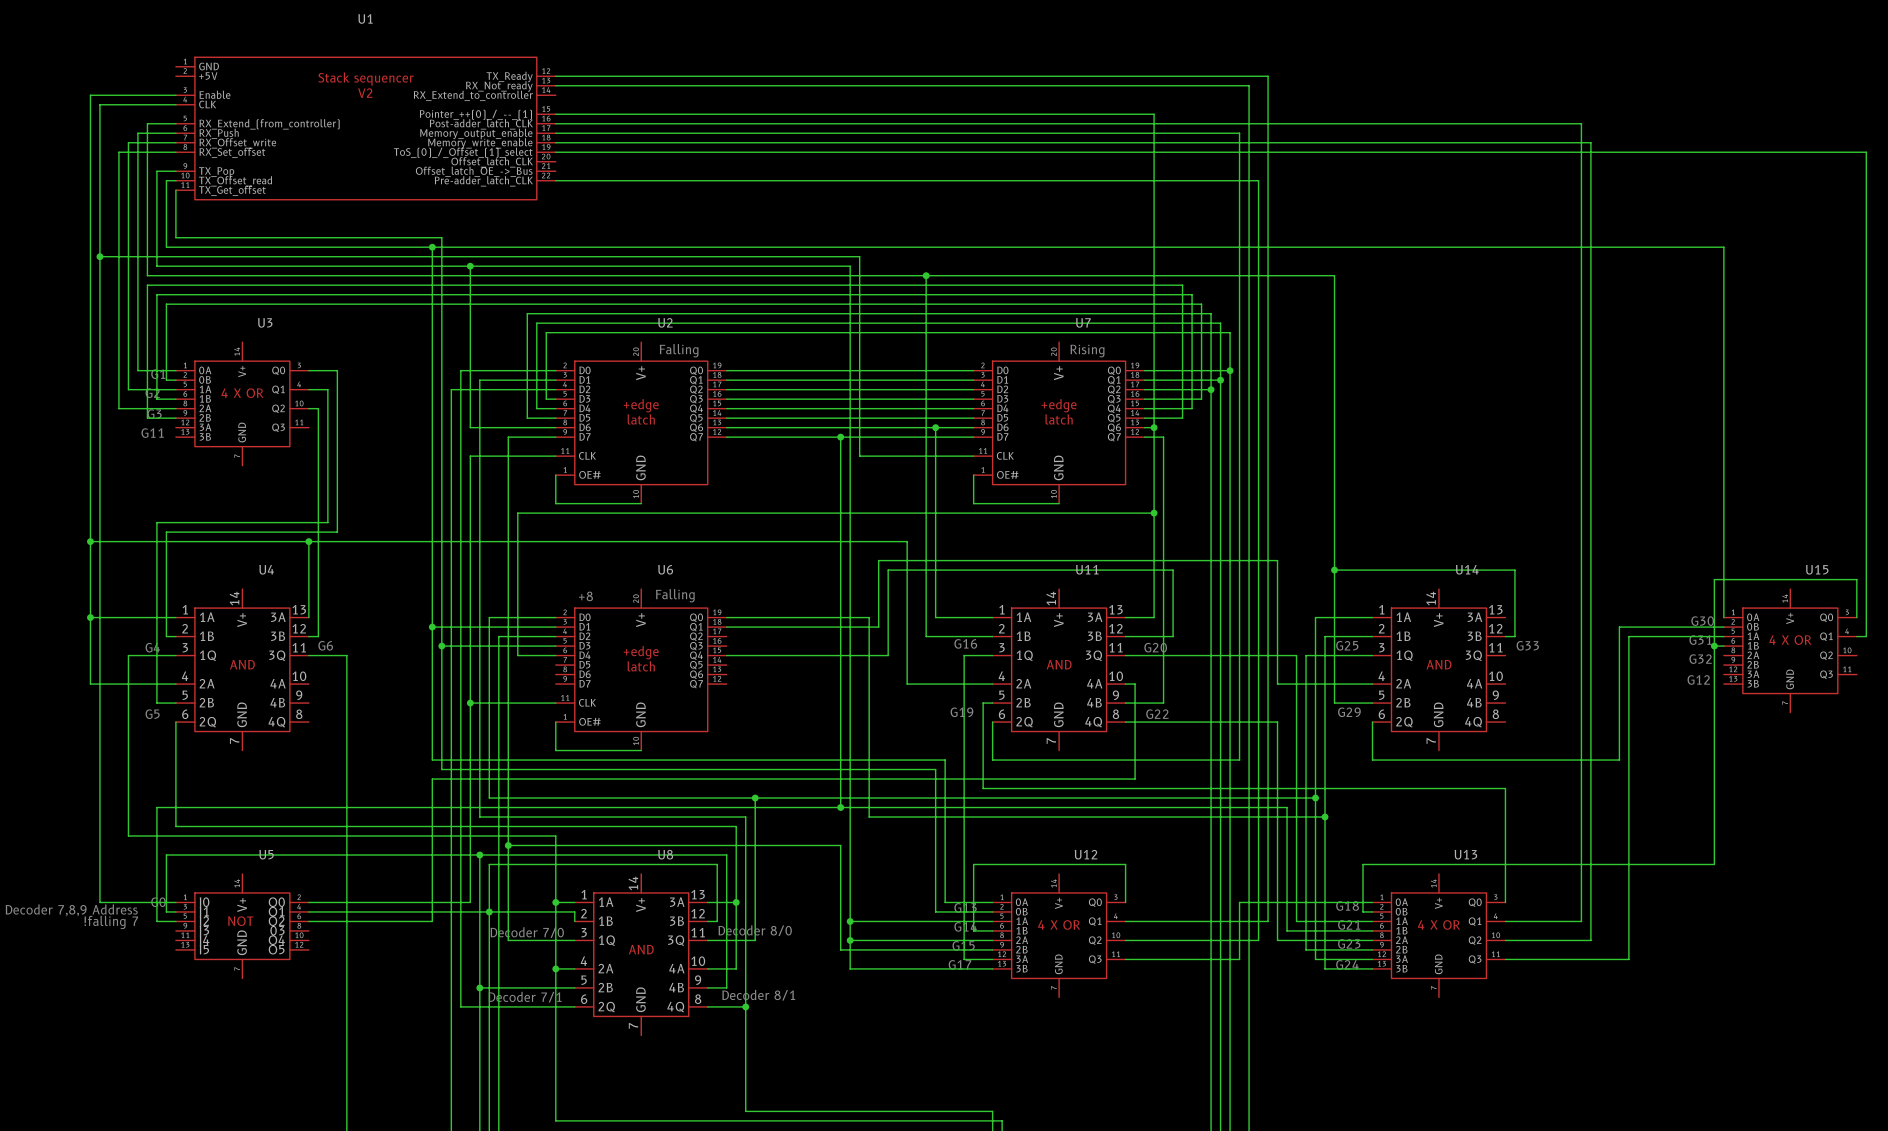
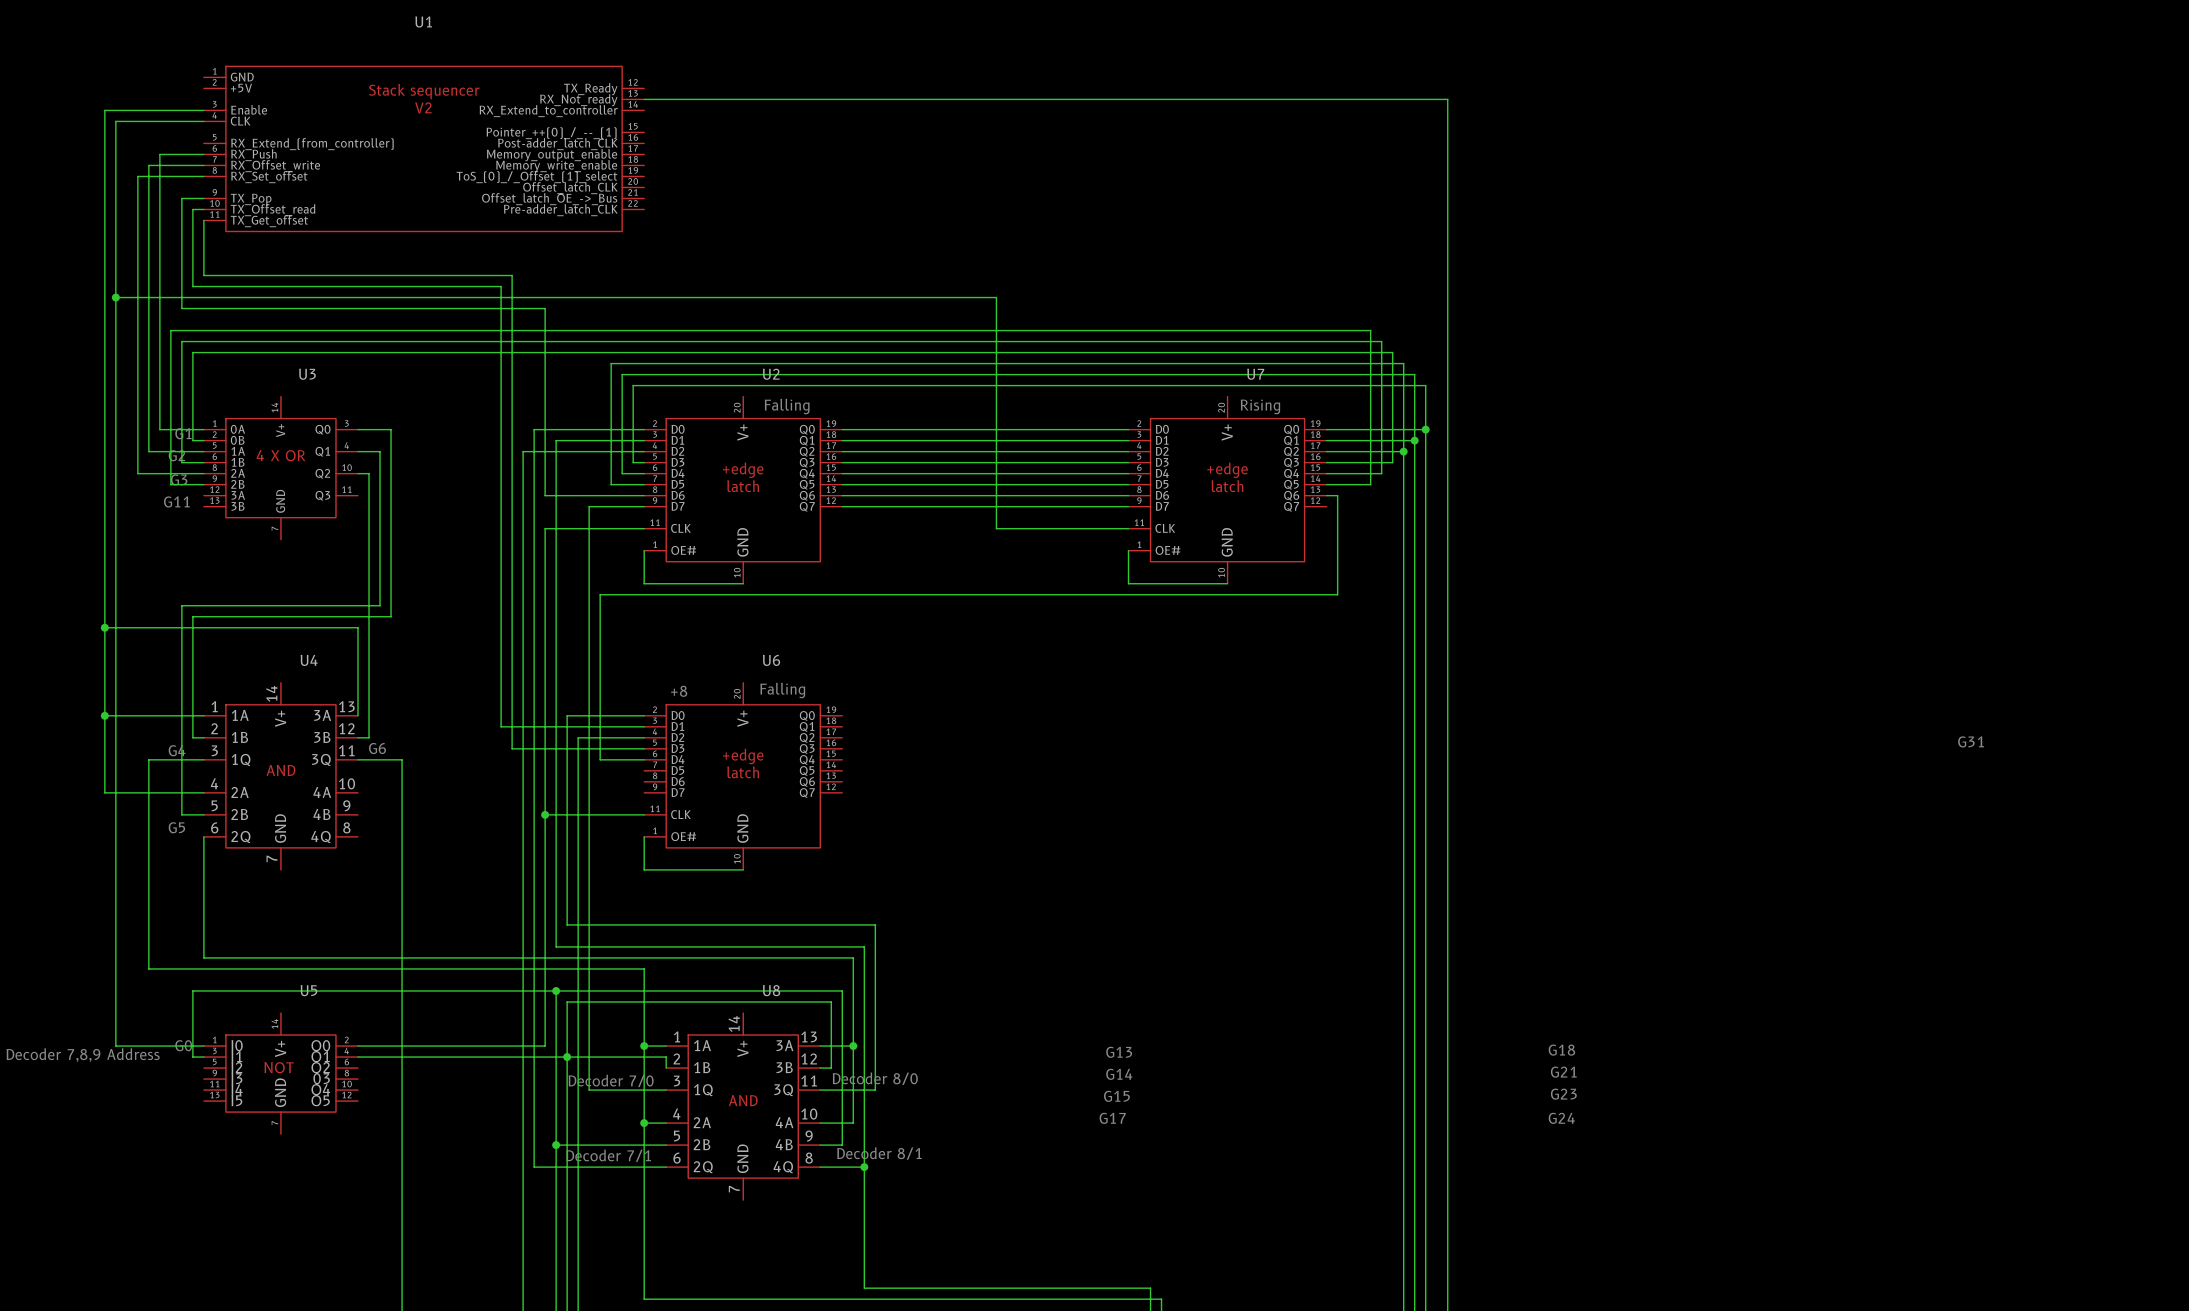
wire: (555, 76) (1268, 76) (1268, 921) (1125, 921) -> none
wire: (555, 114) (1154, 114) (1154, 427) -> none
wire: (175, 123) (147, 123) (147, 275) (1334, 275) (1334, 703) (1372, 703) -> none
wire: (555, 123) (1581, 123) (1581, 921) (1505, 921) -> none
wire: (555, 133) (1239, 133) (1239, 760) (992, 760) (992, 722) -> none
wire: (555, 142) (1590, 142) (1590, 940) (1505, 940) -> none
wire: (555, 152) (1866, 152) (1866, 636) (1856, 636) -> none
wire: (555, 180) (1258, 180) (1258, 940) (1125, 940) -> none
wire: (432, 247) (1723, 247) (1723, 617) -> none
junction: (432, 247) -> none
wire: (470, 266) (850, 266) (850, 968) (992, 968) -> none
junction: (470, 266) -> none
wire: (926, 275) (926, 636) (992, 636) -> none
junction: (926, 275) -> none
wire: (935, 427) (935, 617) (992, 617) -> none
junction: (935, 427) -> none
junction: (1154, 427) -> none
wire: (840, 437) (840, 807) -> none
junction: (840, 437) -> none
wire: (1144, 437) (1163, 437) (1163, 703) (1125, 703) -> none
wire: (1154, 513) (1154, 617) (1125, 617) -> none
junction: (1154, 513) -> none
wire: (308, 541) (907, 541) (907, 684) (992, 684) -> none
junction: (308, 541) -> none
wire: (1334, 570) (1514, 570) (1514, 636) (1505, 636) -> none
junction: (1334, 570) -> none
wire: (726, 617) (869, 617) (869, 817) (1325, 817) -> none
wire: (1372, 617) (1315, 617) (1315, 959) (1372, 959) -> none
wire: (1856, 617) (1856, 579) (1714, 579) (1714, 864) (1363, 864) (1363, 911) (1372, 911) -> none
text: G30 (1702, 621) -> none
wire: (432, 627) (432, 760) (945, 760) (945, 902) (992, 902) -> none
junction: (432, 627) -> none
wire: (726, 627) (878, 627) (878, 560) (1277, 560) (1277, 684) (1372, 684) -> none
wire: (1723, 627) (1619, 627) (1619, 760) (1372, 760) (1372, 722) -> none
wire: (1125, 636) (1173, 636) (1173, 570) (888, 570) (888, 655) (726, 655) -> none
wire: (1372, 636) (1325, 636) (1325, 968) (1372, 968) -> none
wire: (1723, 636) (1628, 636) (1628, 959) (1505, 959) -> none
text: G16 (965, 643) -> none
text: G25 (1347, 645) -> none
text: G33 (1527, 645) -> none
wire: (441, 646) (441, 769) (935, 769) (935, 911) (992, 911) -> none
junction: (441, 646) -> none
wire: (1714, 646) (1723, 646) -> none
junction: (1714, 646) -> none
text: G20 (1155, 647) -> none
U15: (1790, 650) -> none
wire: (992, 655) (964, 655) (964, 959) (992, 959) -> none
wire: (1125, 655) (1296, 655) (1296, 921) (1372, 921) -> none
wire: (1372, 655) (1306, 655) (1306, 949) (1372, 949) -> none
text: G32 (1700, 659) -> none
U11: (1059, 669) -> none
U14: (1438, 669) -> none
text: G12 (1698, 679) -> none
wire: (1125, 684) (1135, 684) (1135, 779) (432, 779) (432, 921) (308, 921) -> none
wire: (992, 703) (983, 703) (983, 788) (1505, 788) (1505, 902) -> none
text: G19 (961, 712) -> none
text: G29 (1349, 712) -> none
text: G22 (1157, 714) -> none
wire: (1125, 722) (1277, 722) (1277, 940) (1372, 940) -> none
wire: (755, 798) (1315, 798) -> none
junction: (755, 798) -> none
junction: (1315, 798) -> none
junction: (840, 807) -> none
junction: (1325, 817) -> none
wire: (508, 845) (840, 845) (840, 949) (992, 949) -> none
junction: (508, 845) -> none
wire: (1125, 902) (1125, 864) (973, 864) (973, 930) (992, 930) -> none
wire: (1372, 902) (1239, 902) (1239, 959) (1125, 959) -> none
wire: (175, 921) (156, 921) (156, 807) (1287, 807) (1287, 930) (1372, 930) -> none
wire: (850, 921) (992, 921) -> none
junction: (850, 921) -> none
text: !falling 7 (111, 922) -> none
U12: (1059, 935) -> none
U13: (1438, 935) -> none
wire: (850, 940) (992, 940) -> none
junction: (850, 940) -> none

